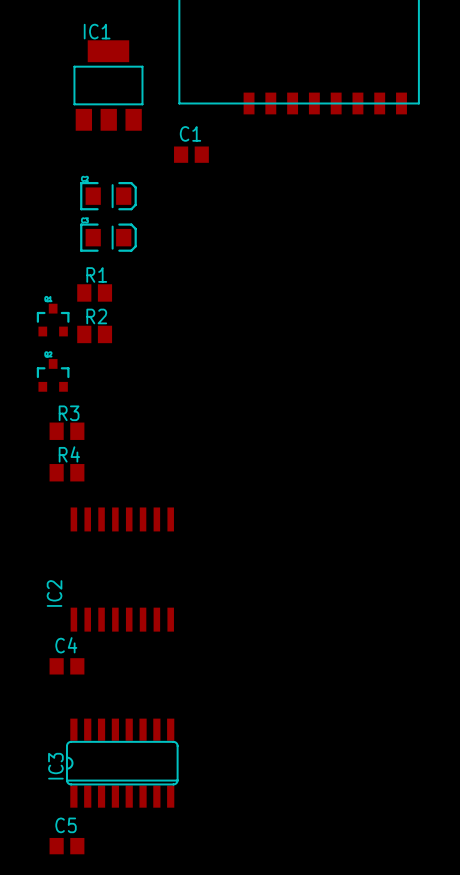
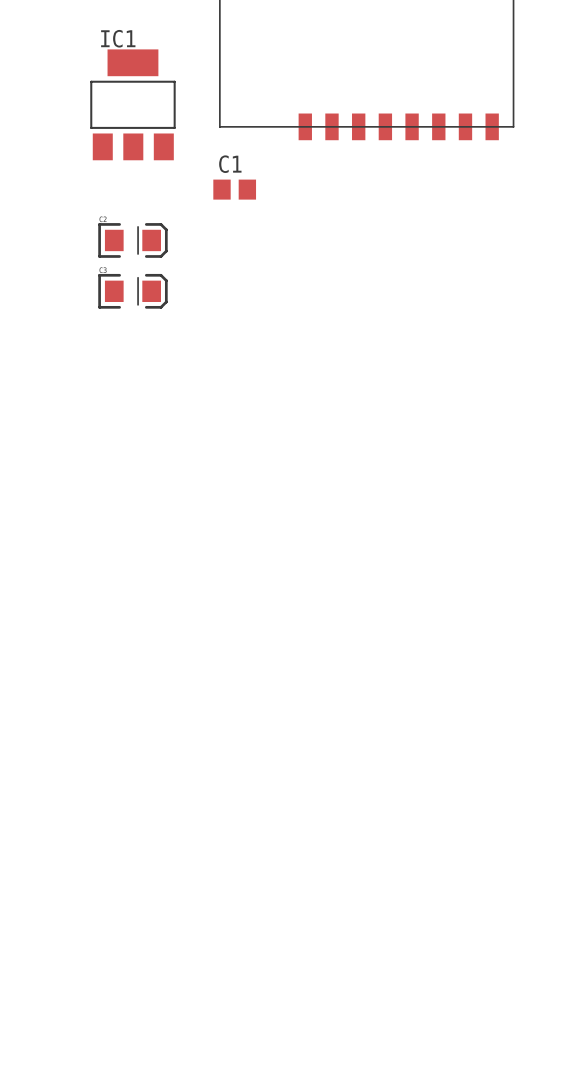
R1: (94, 292) -> none
part: (53, 320) -> none
R2: (94, 334) -> none
part: (53, 375) -> none
R3: (66, 431) -> none
R4: (66, 472) -> none
IC2: (122, 569) -> none
C4: (66, 666) -> none
IC3: (122, 763) -> none
C5: (66, 846) -> none

